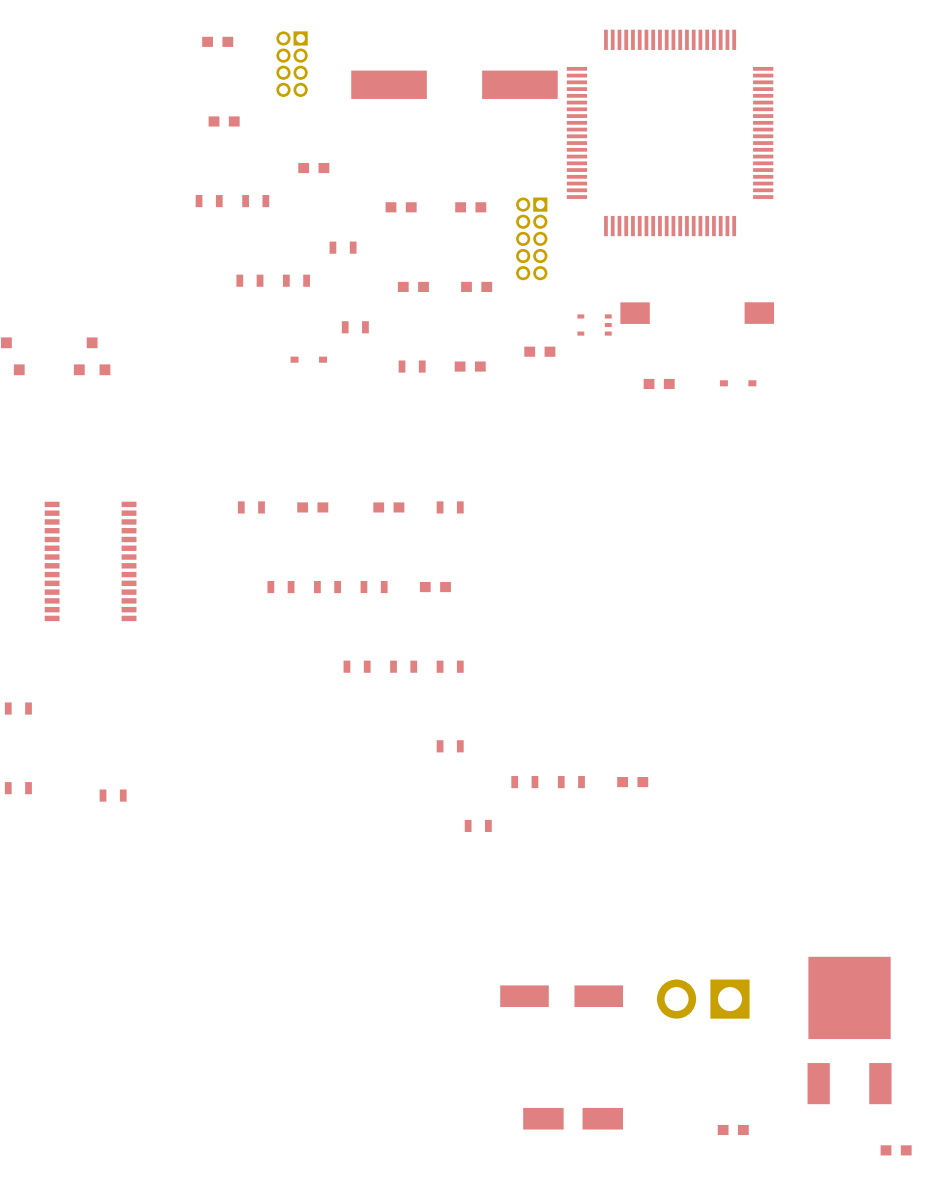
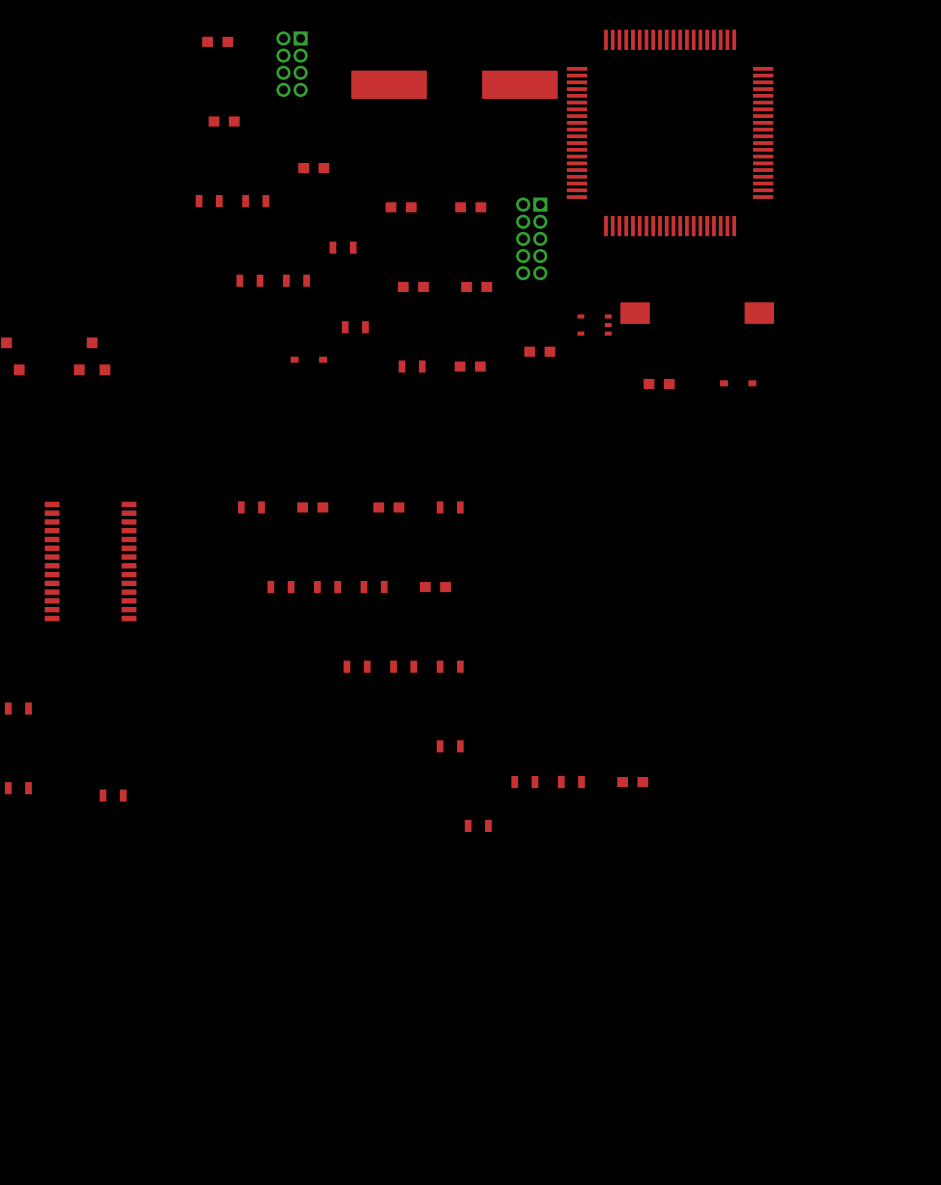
part: (561, 996) -> none
part: (703, 999) -> none
part: (849, 1030) -> none
part: (573, 1118) -> none
part: (733, 1129) -> none
part: (896, 1150) -> none

